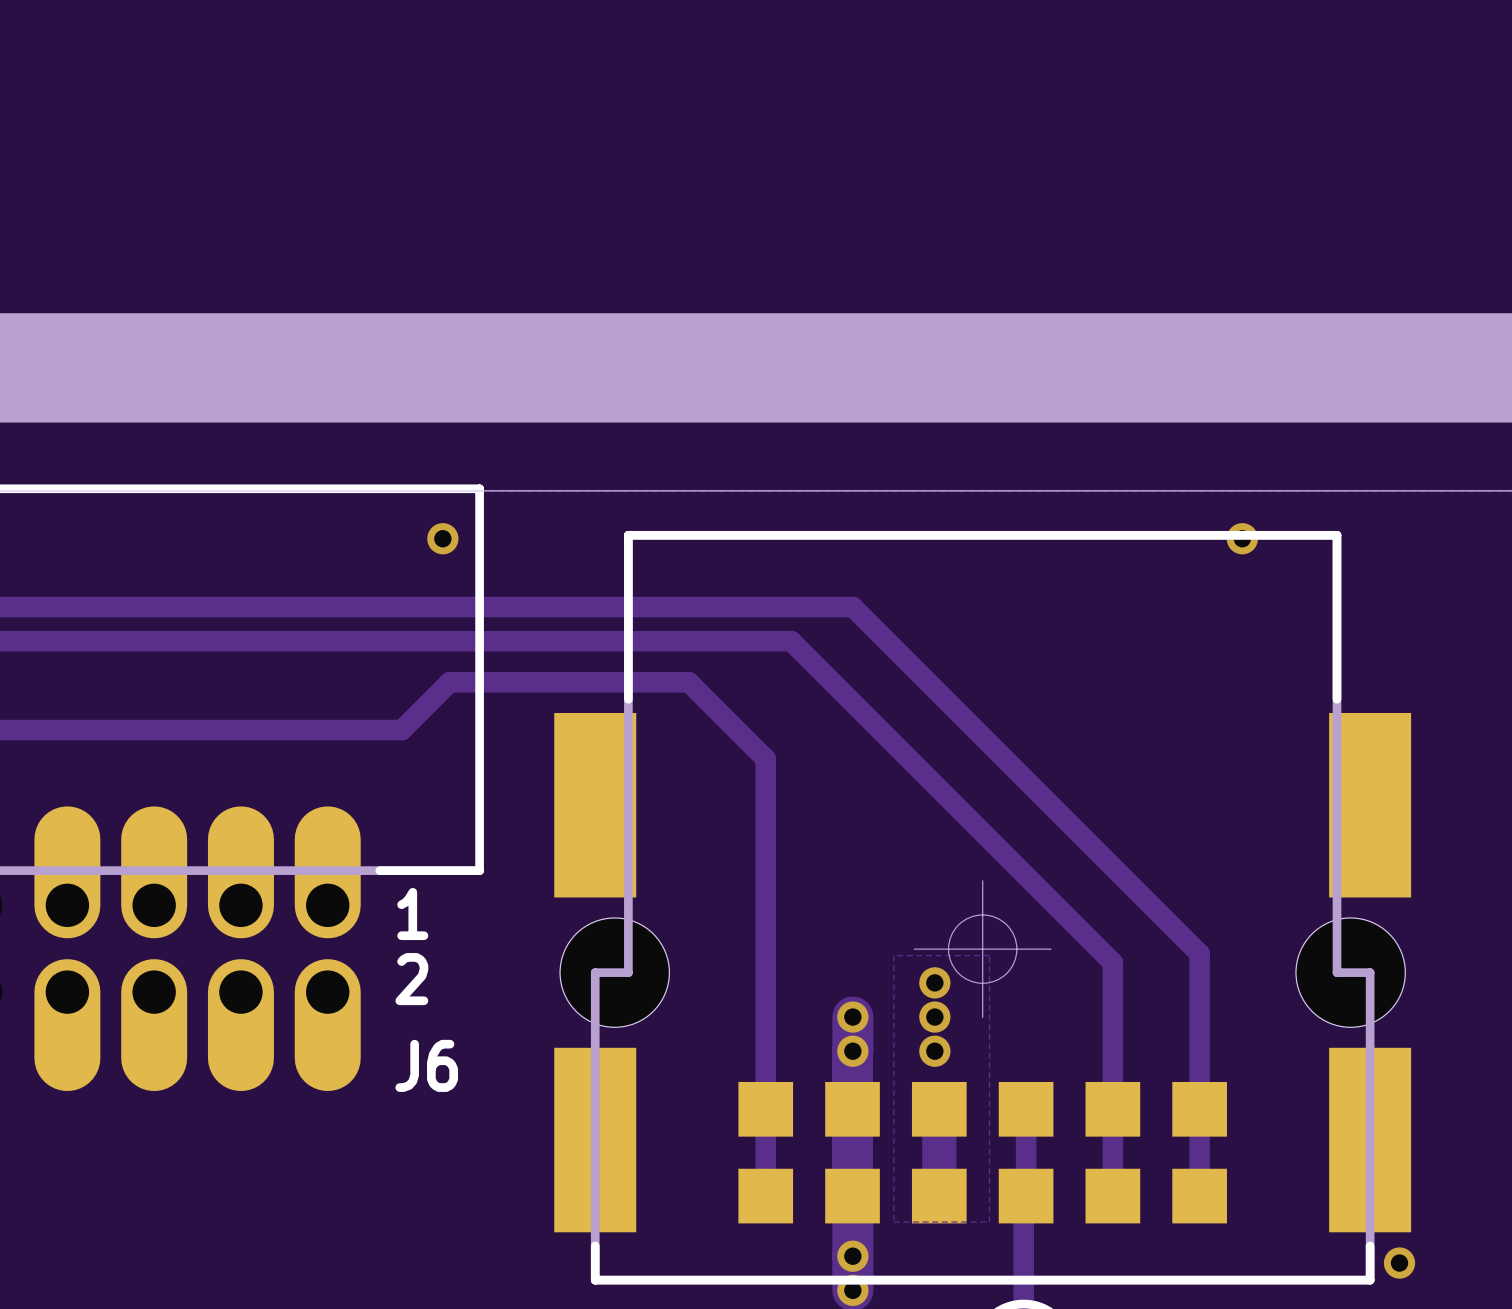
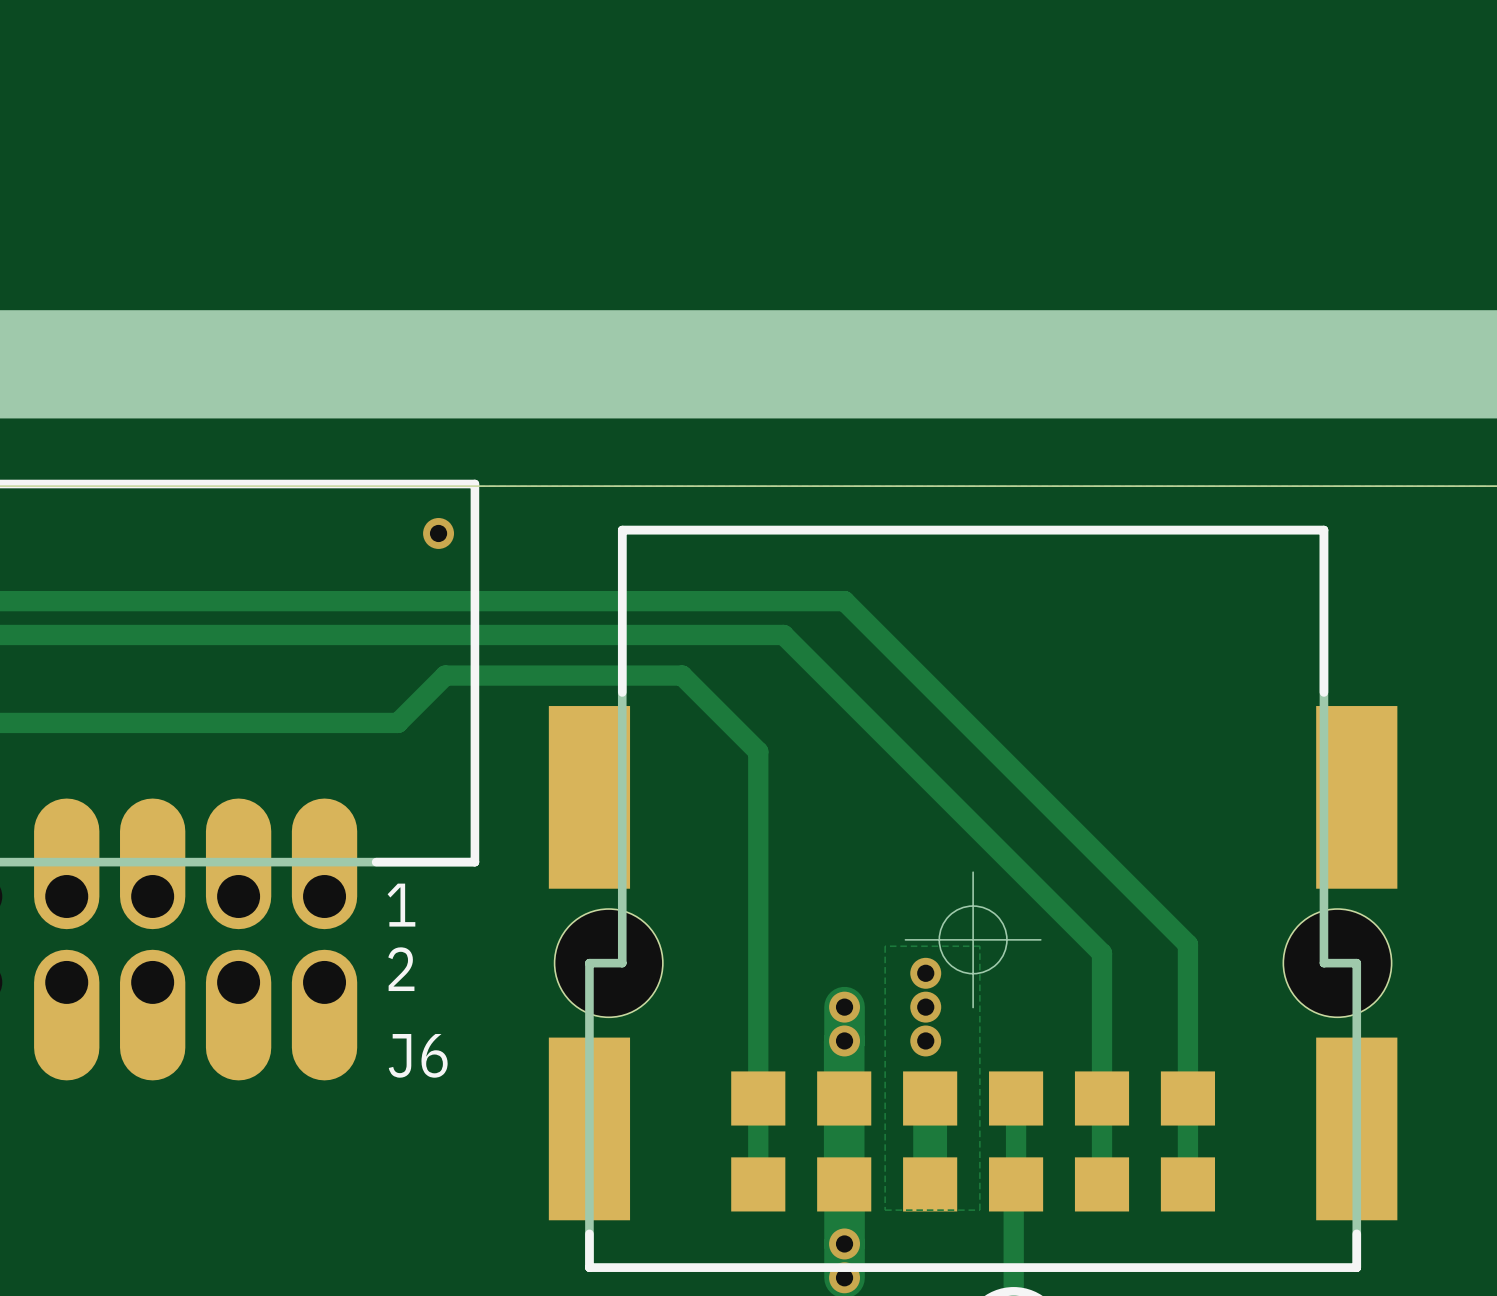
via: (1242, 538) -> none
via: (1399, 1263) -> none

